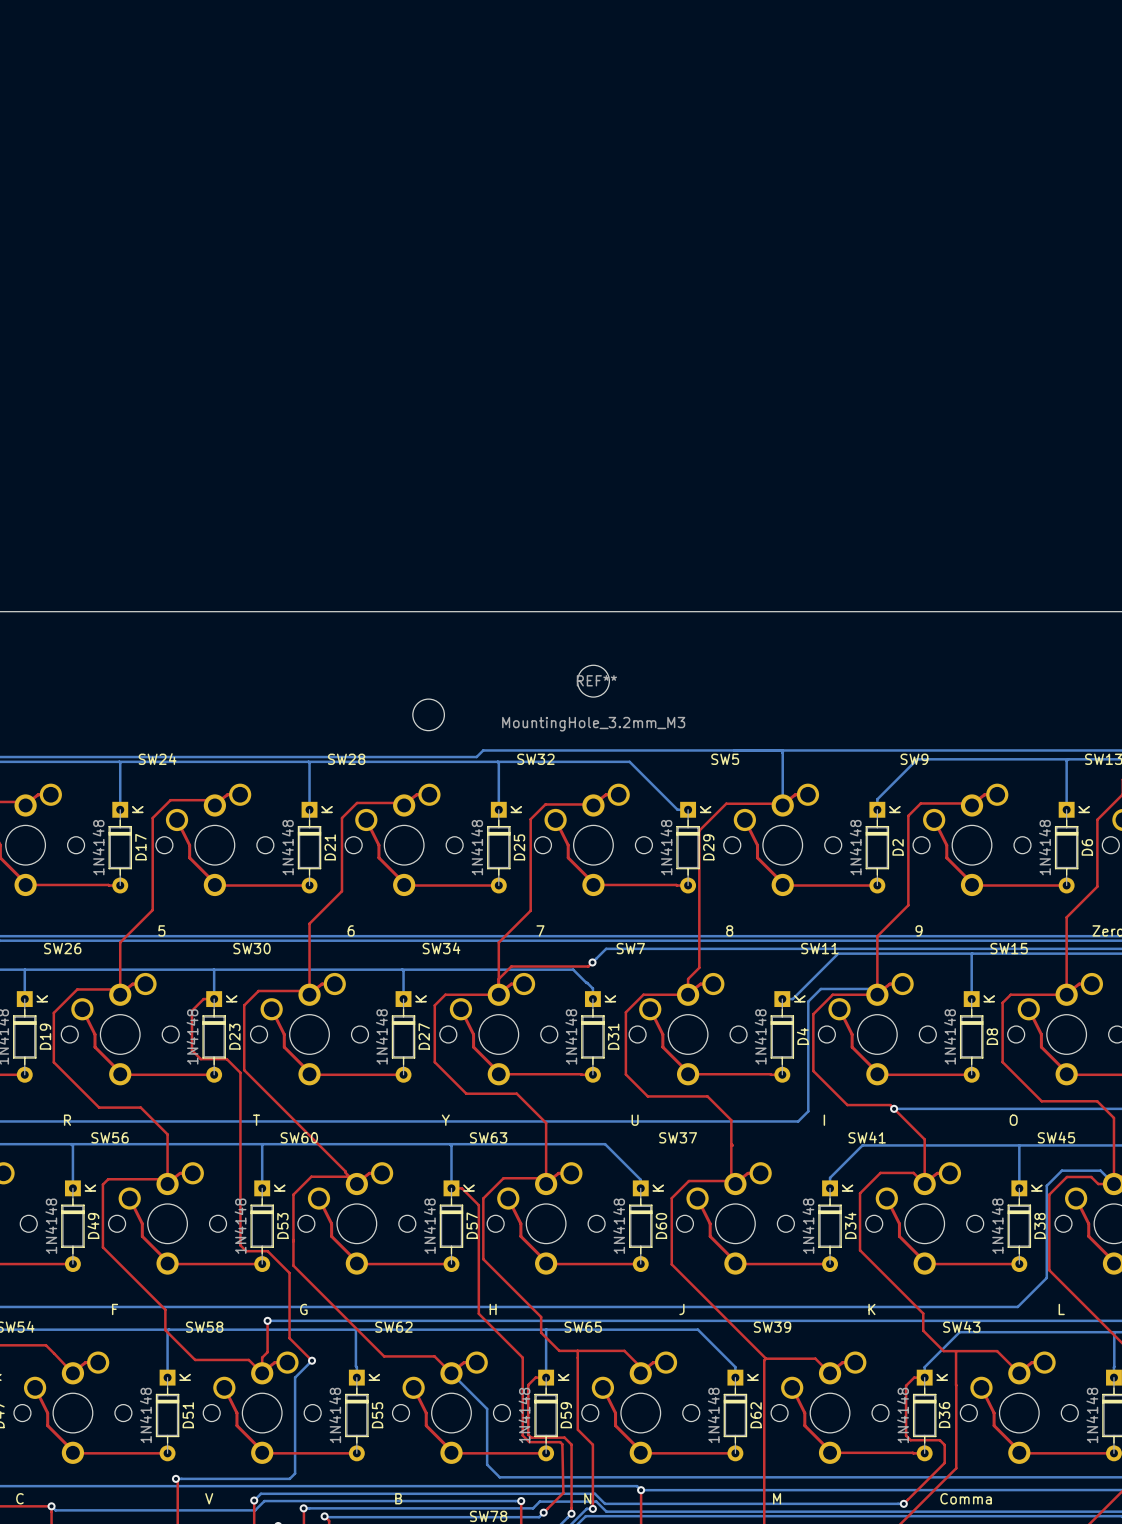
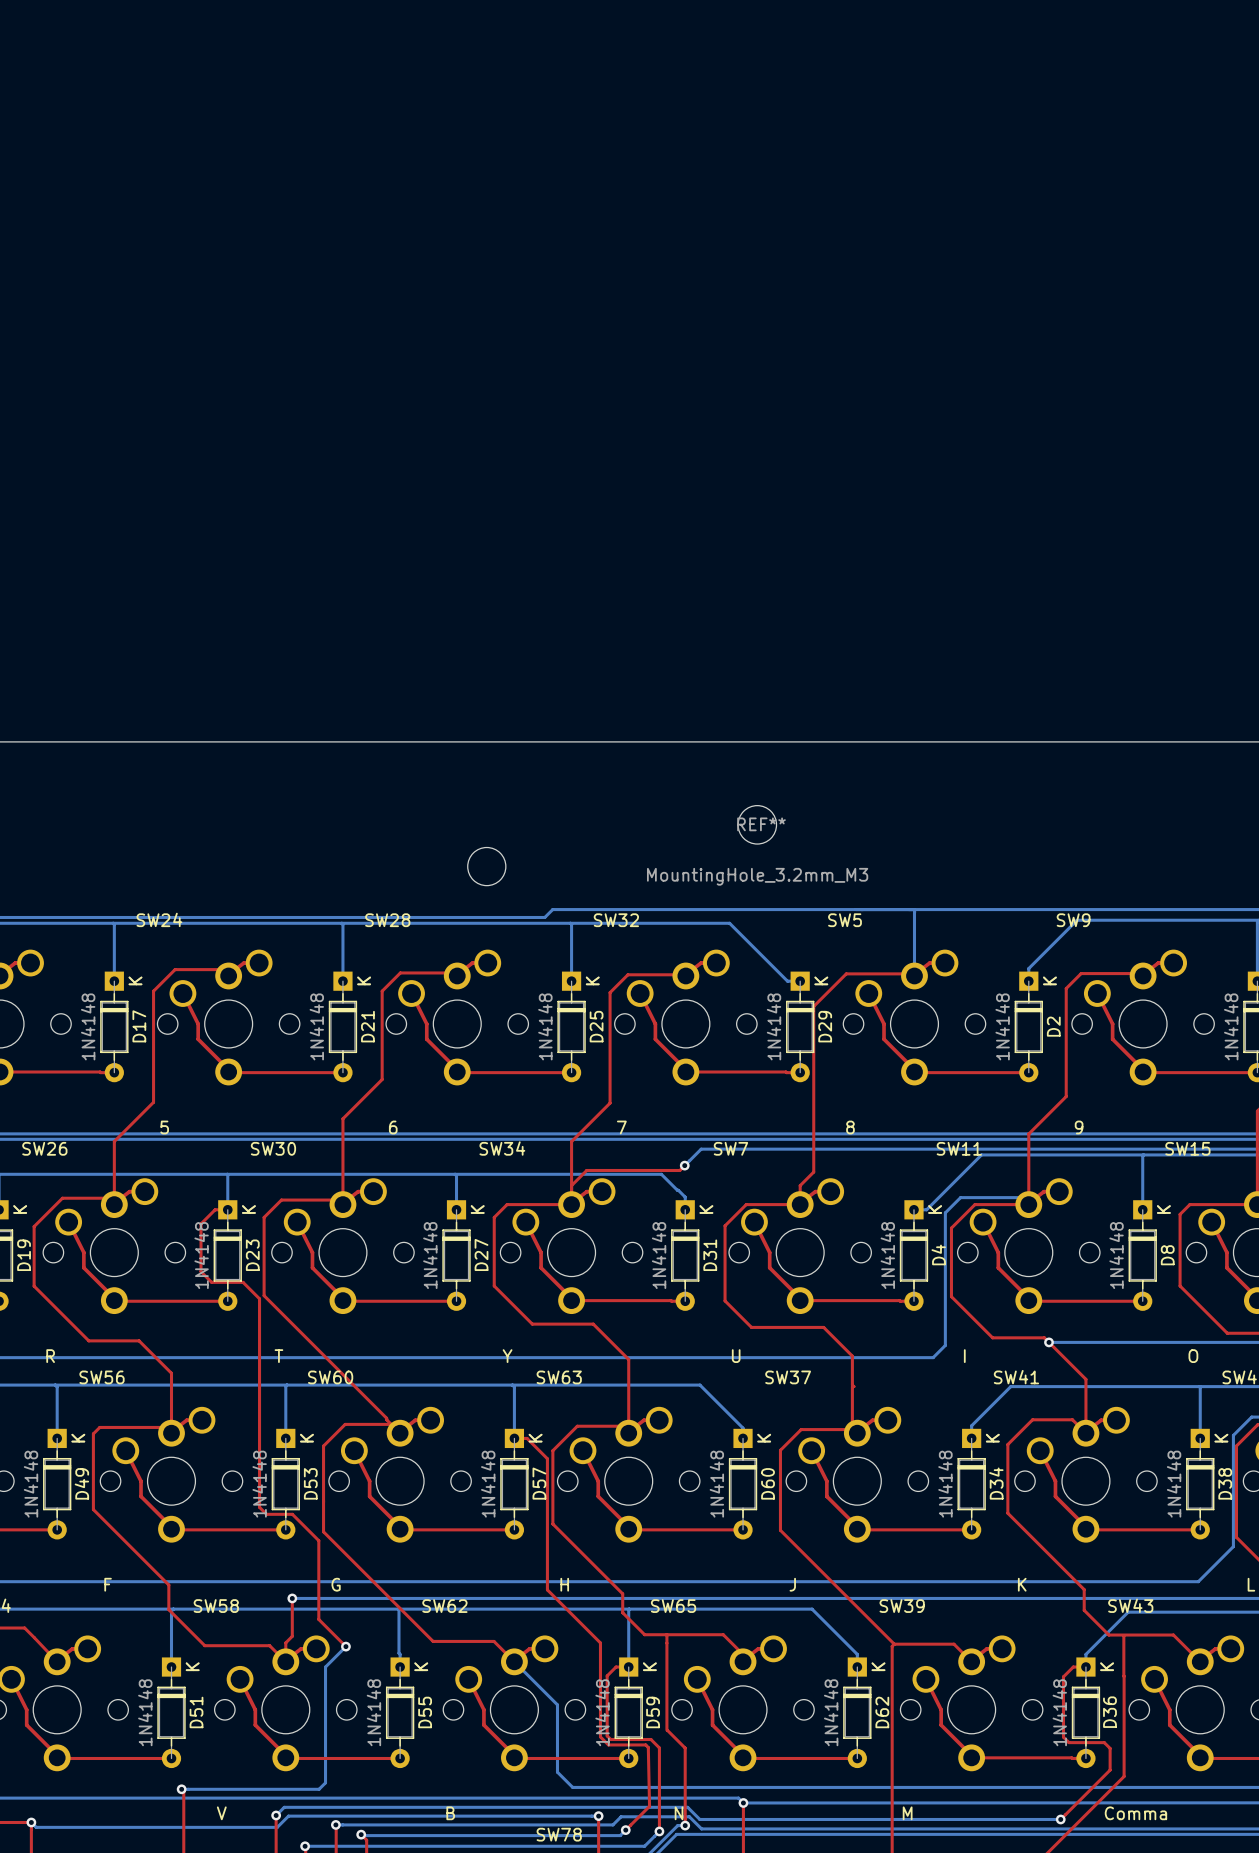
REF** position: (593, 681) -> (757, 824)

